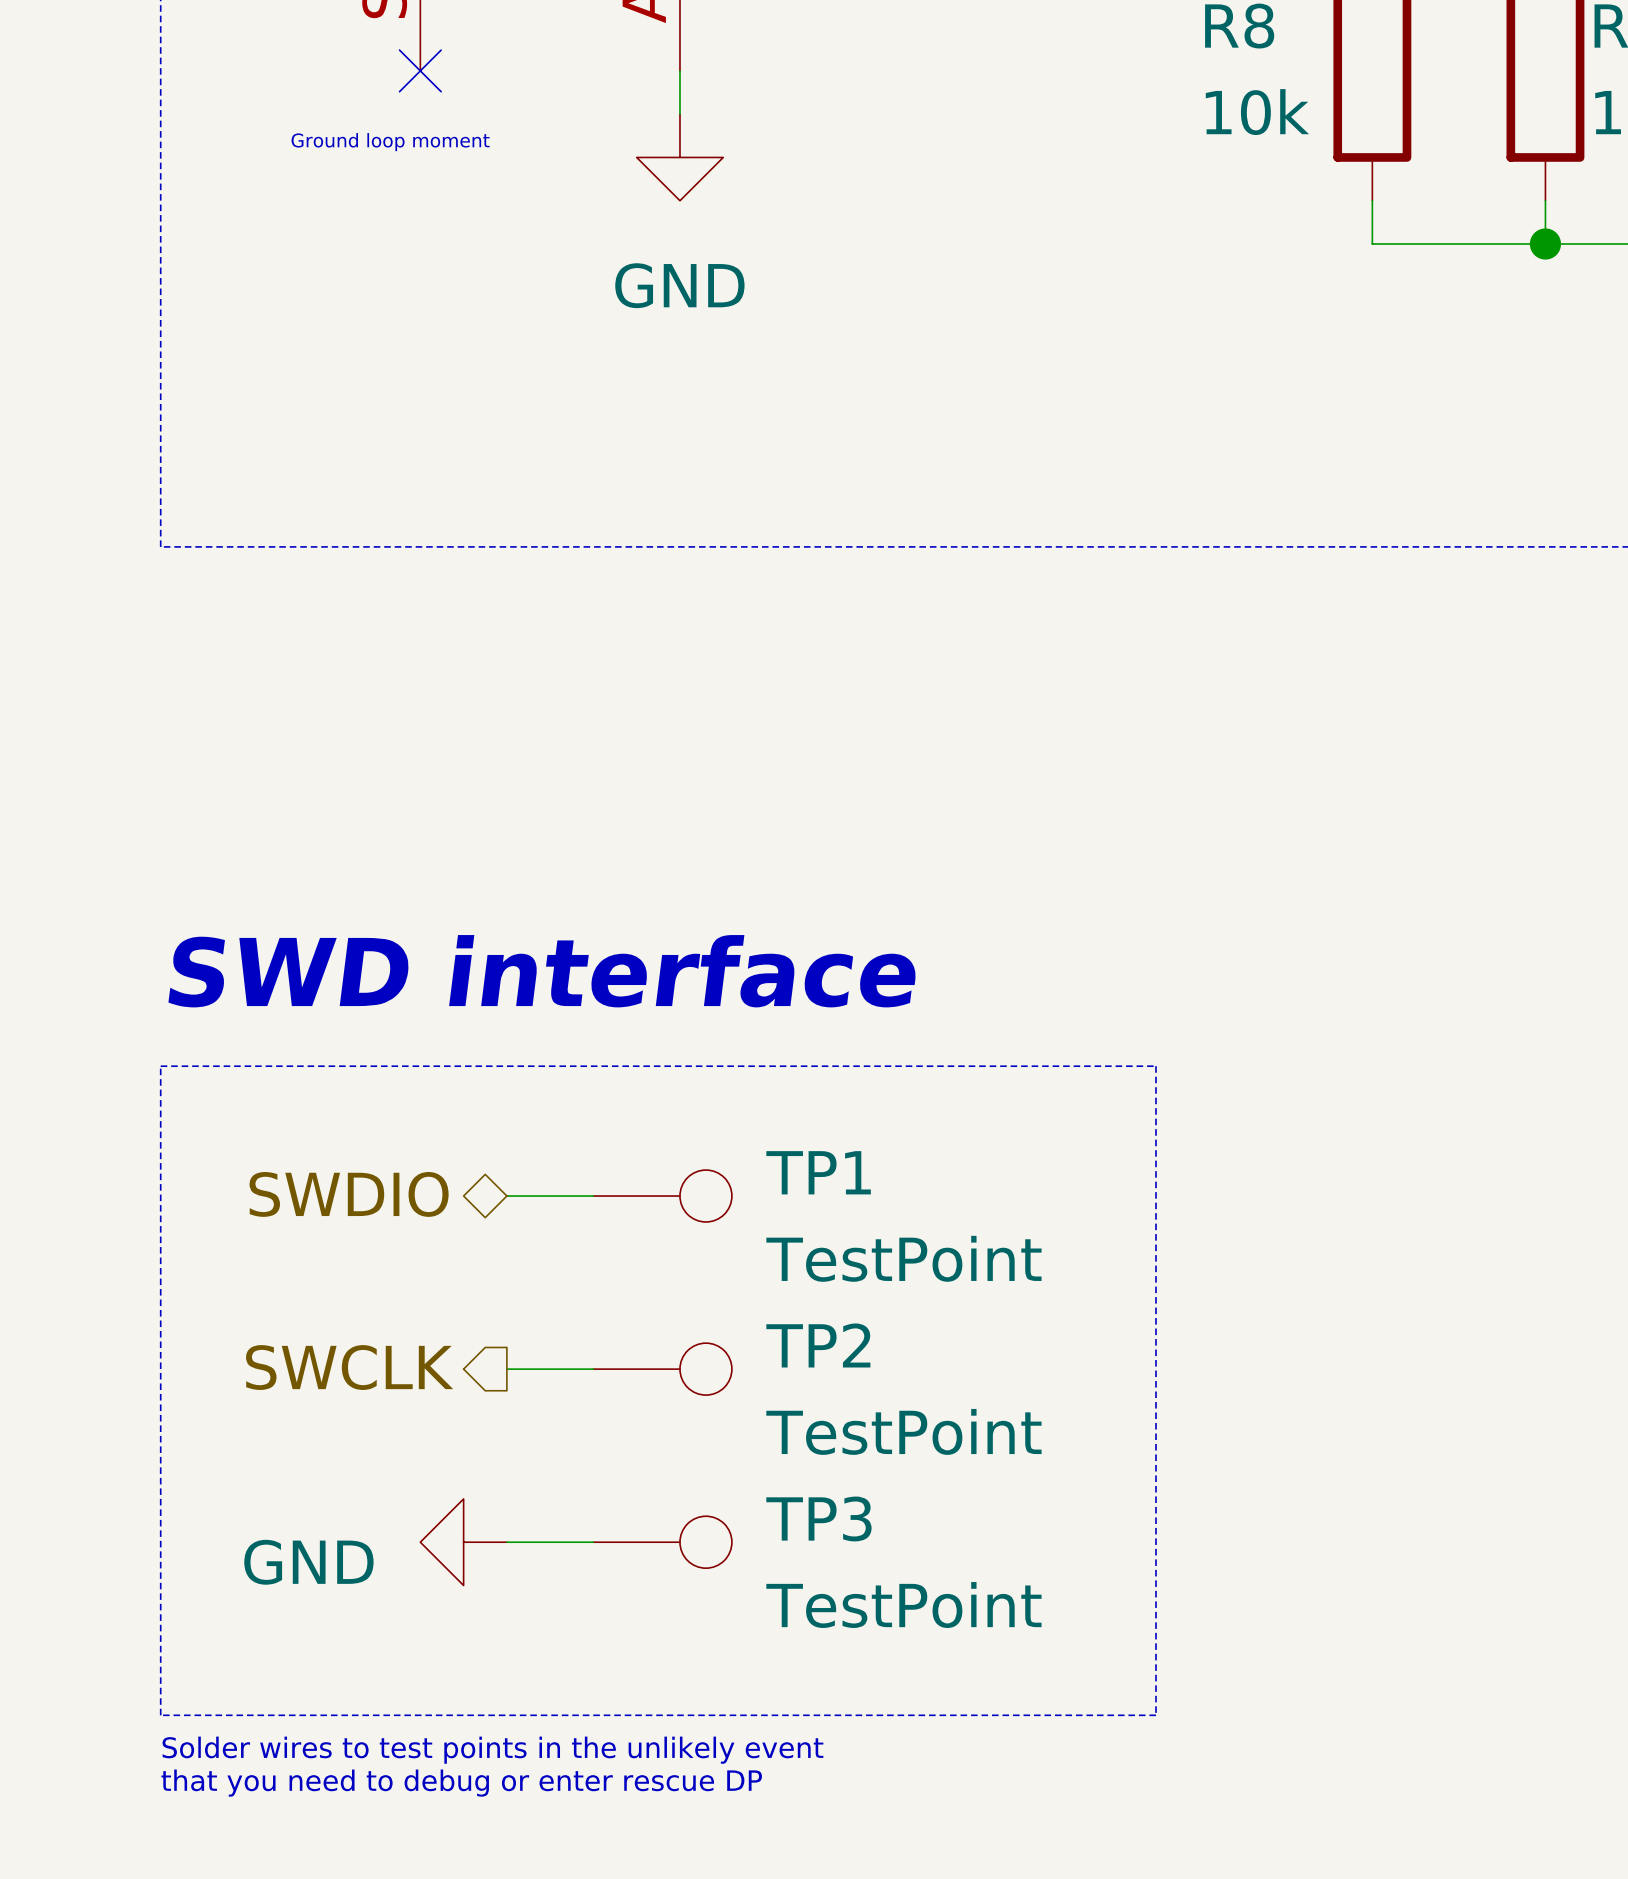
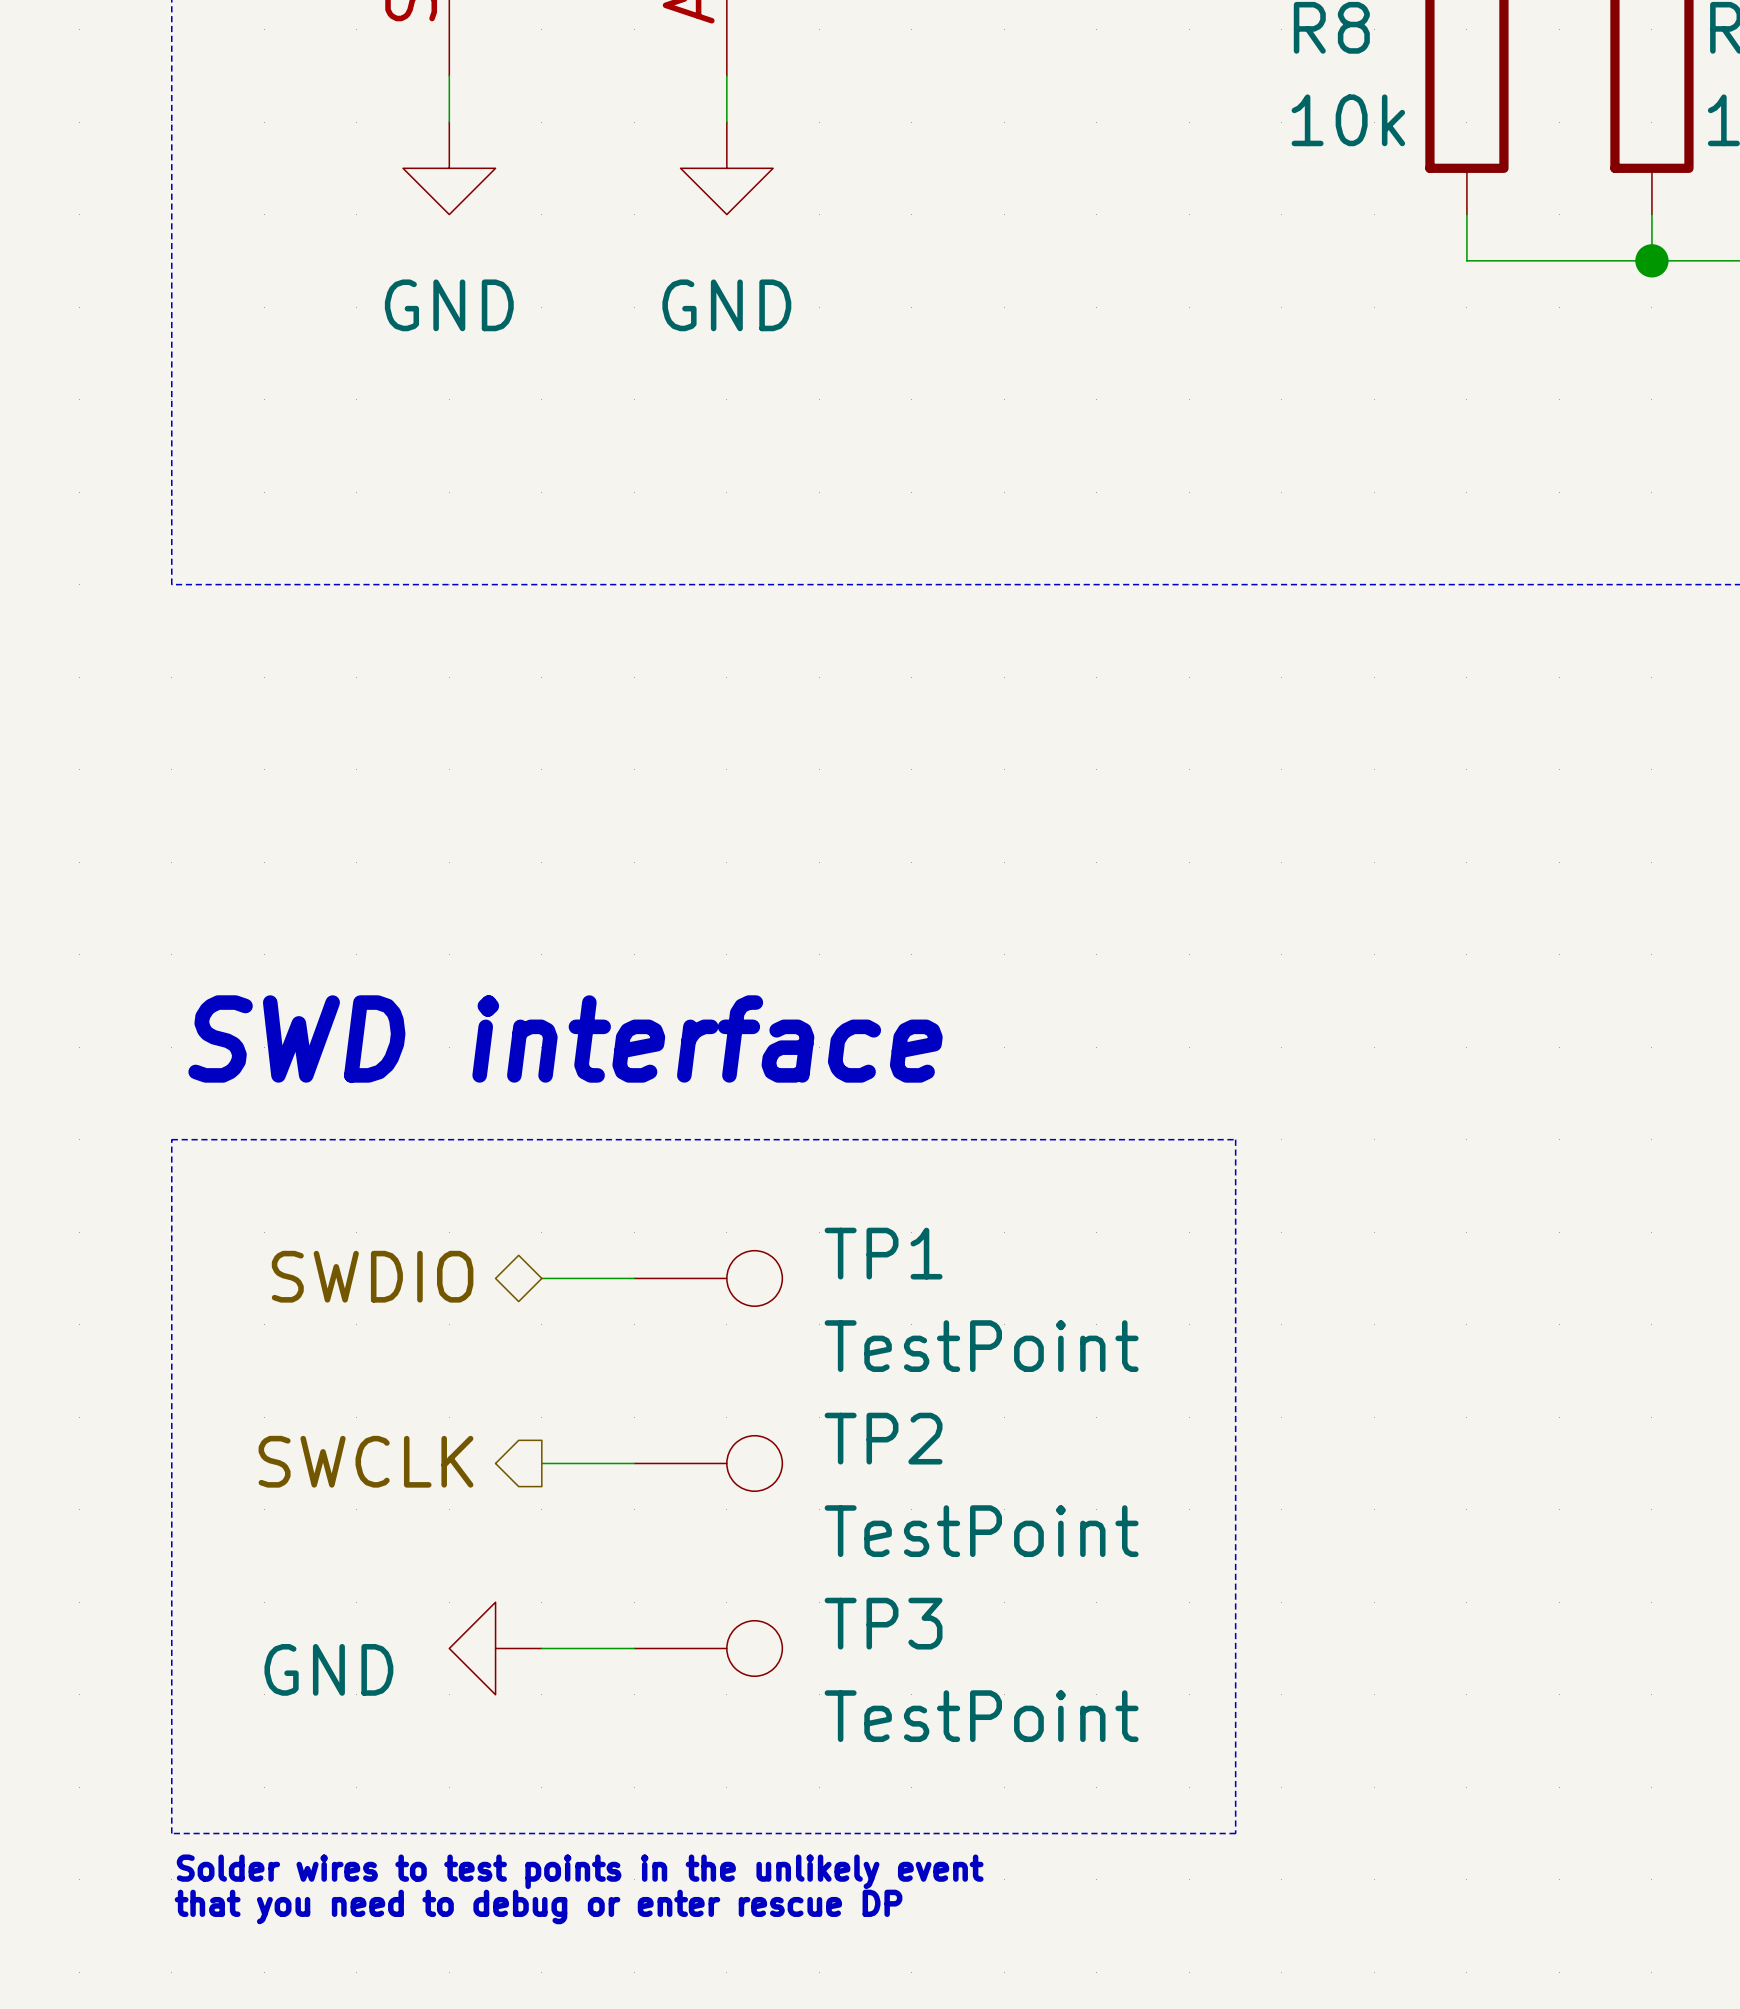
wire: none -> (449, 75) (449, 122)
no-connect mark: (420, 70) -> none
text: Ground loop moment (390, 142) -> none
power symbol: none -> GND (449, 168)

